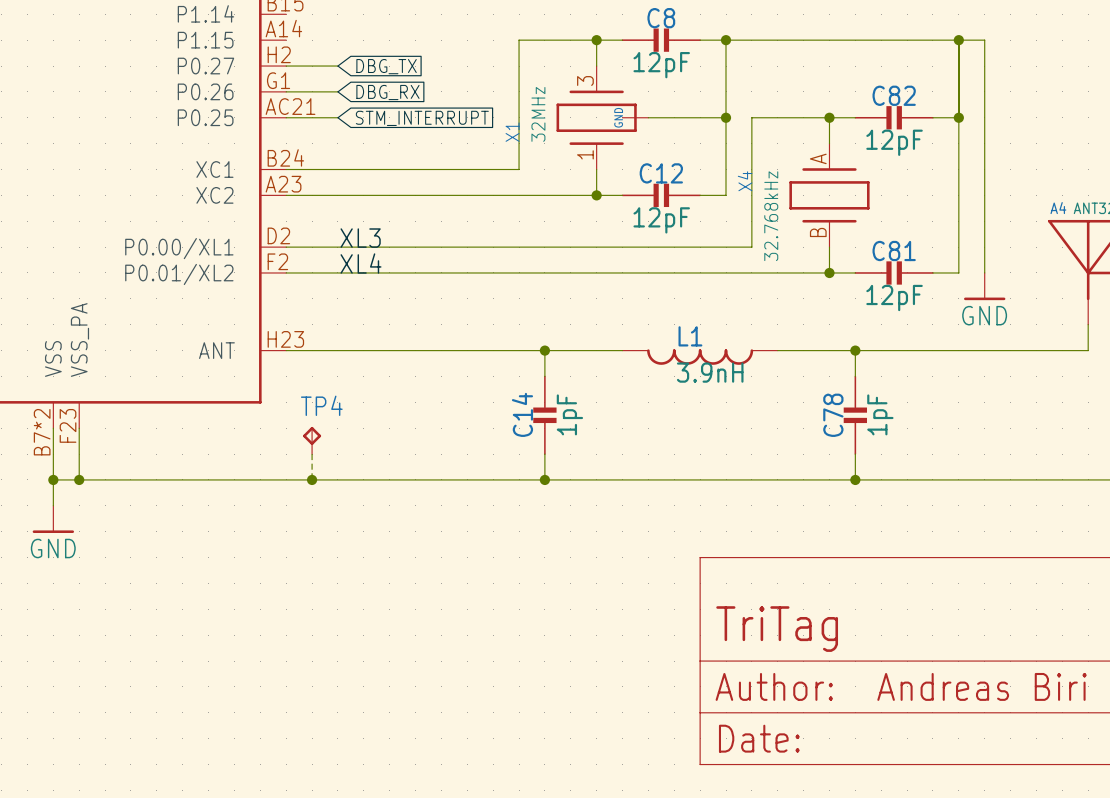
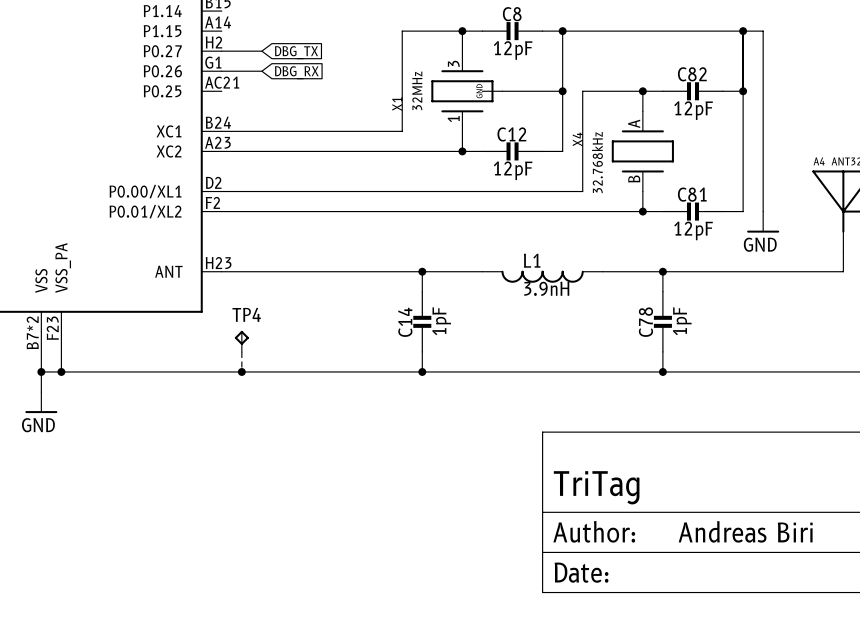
wire: (286, 117) (337, 117) -> none
global label: STM_INTERRUPT (422, 118) -> none
label: XL3 (360, 238) -> none
label: XL4 (361, 263) -> none

